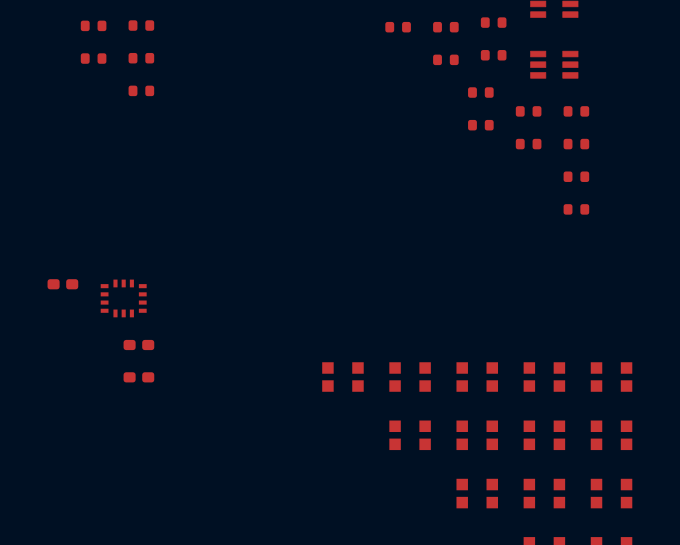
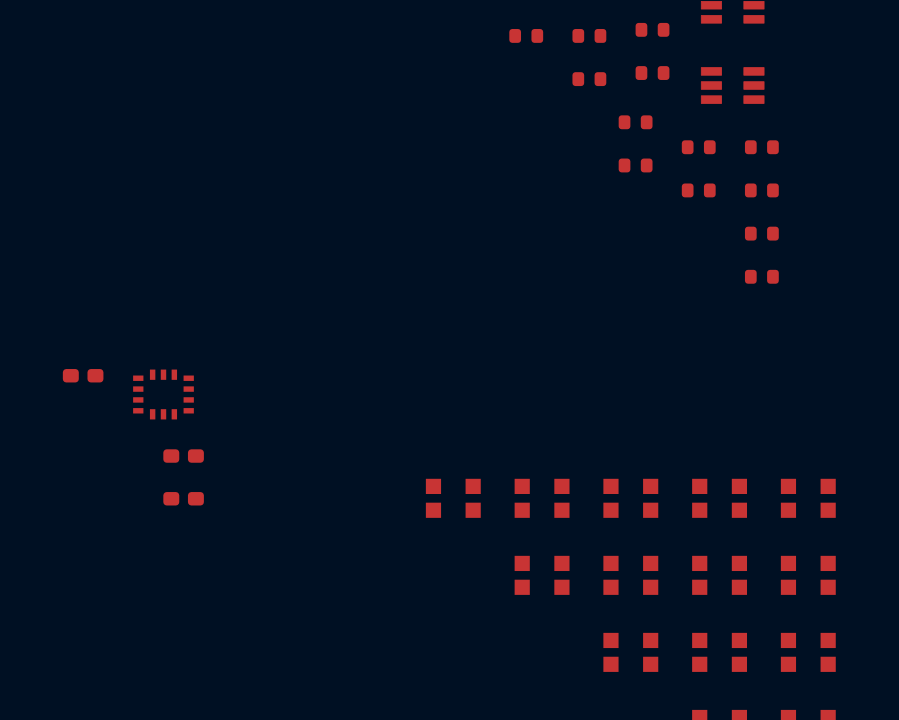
part: (93, 25) -> none
part: (141, 25) -> none
part: (93, 58) -> none
part: (141, 58) -> none
part: (141, 90) -> none

